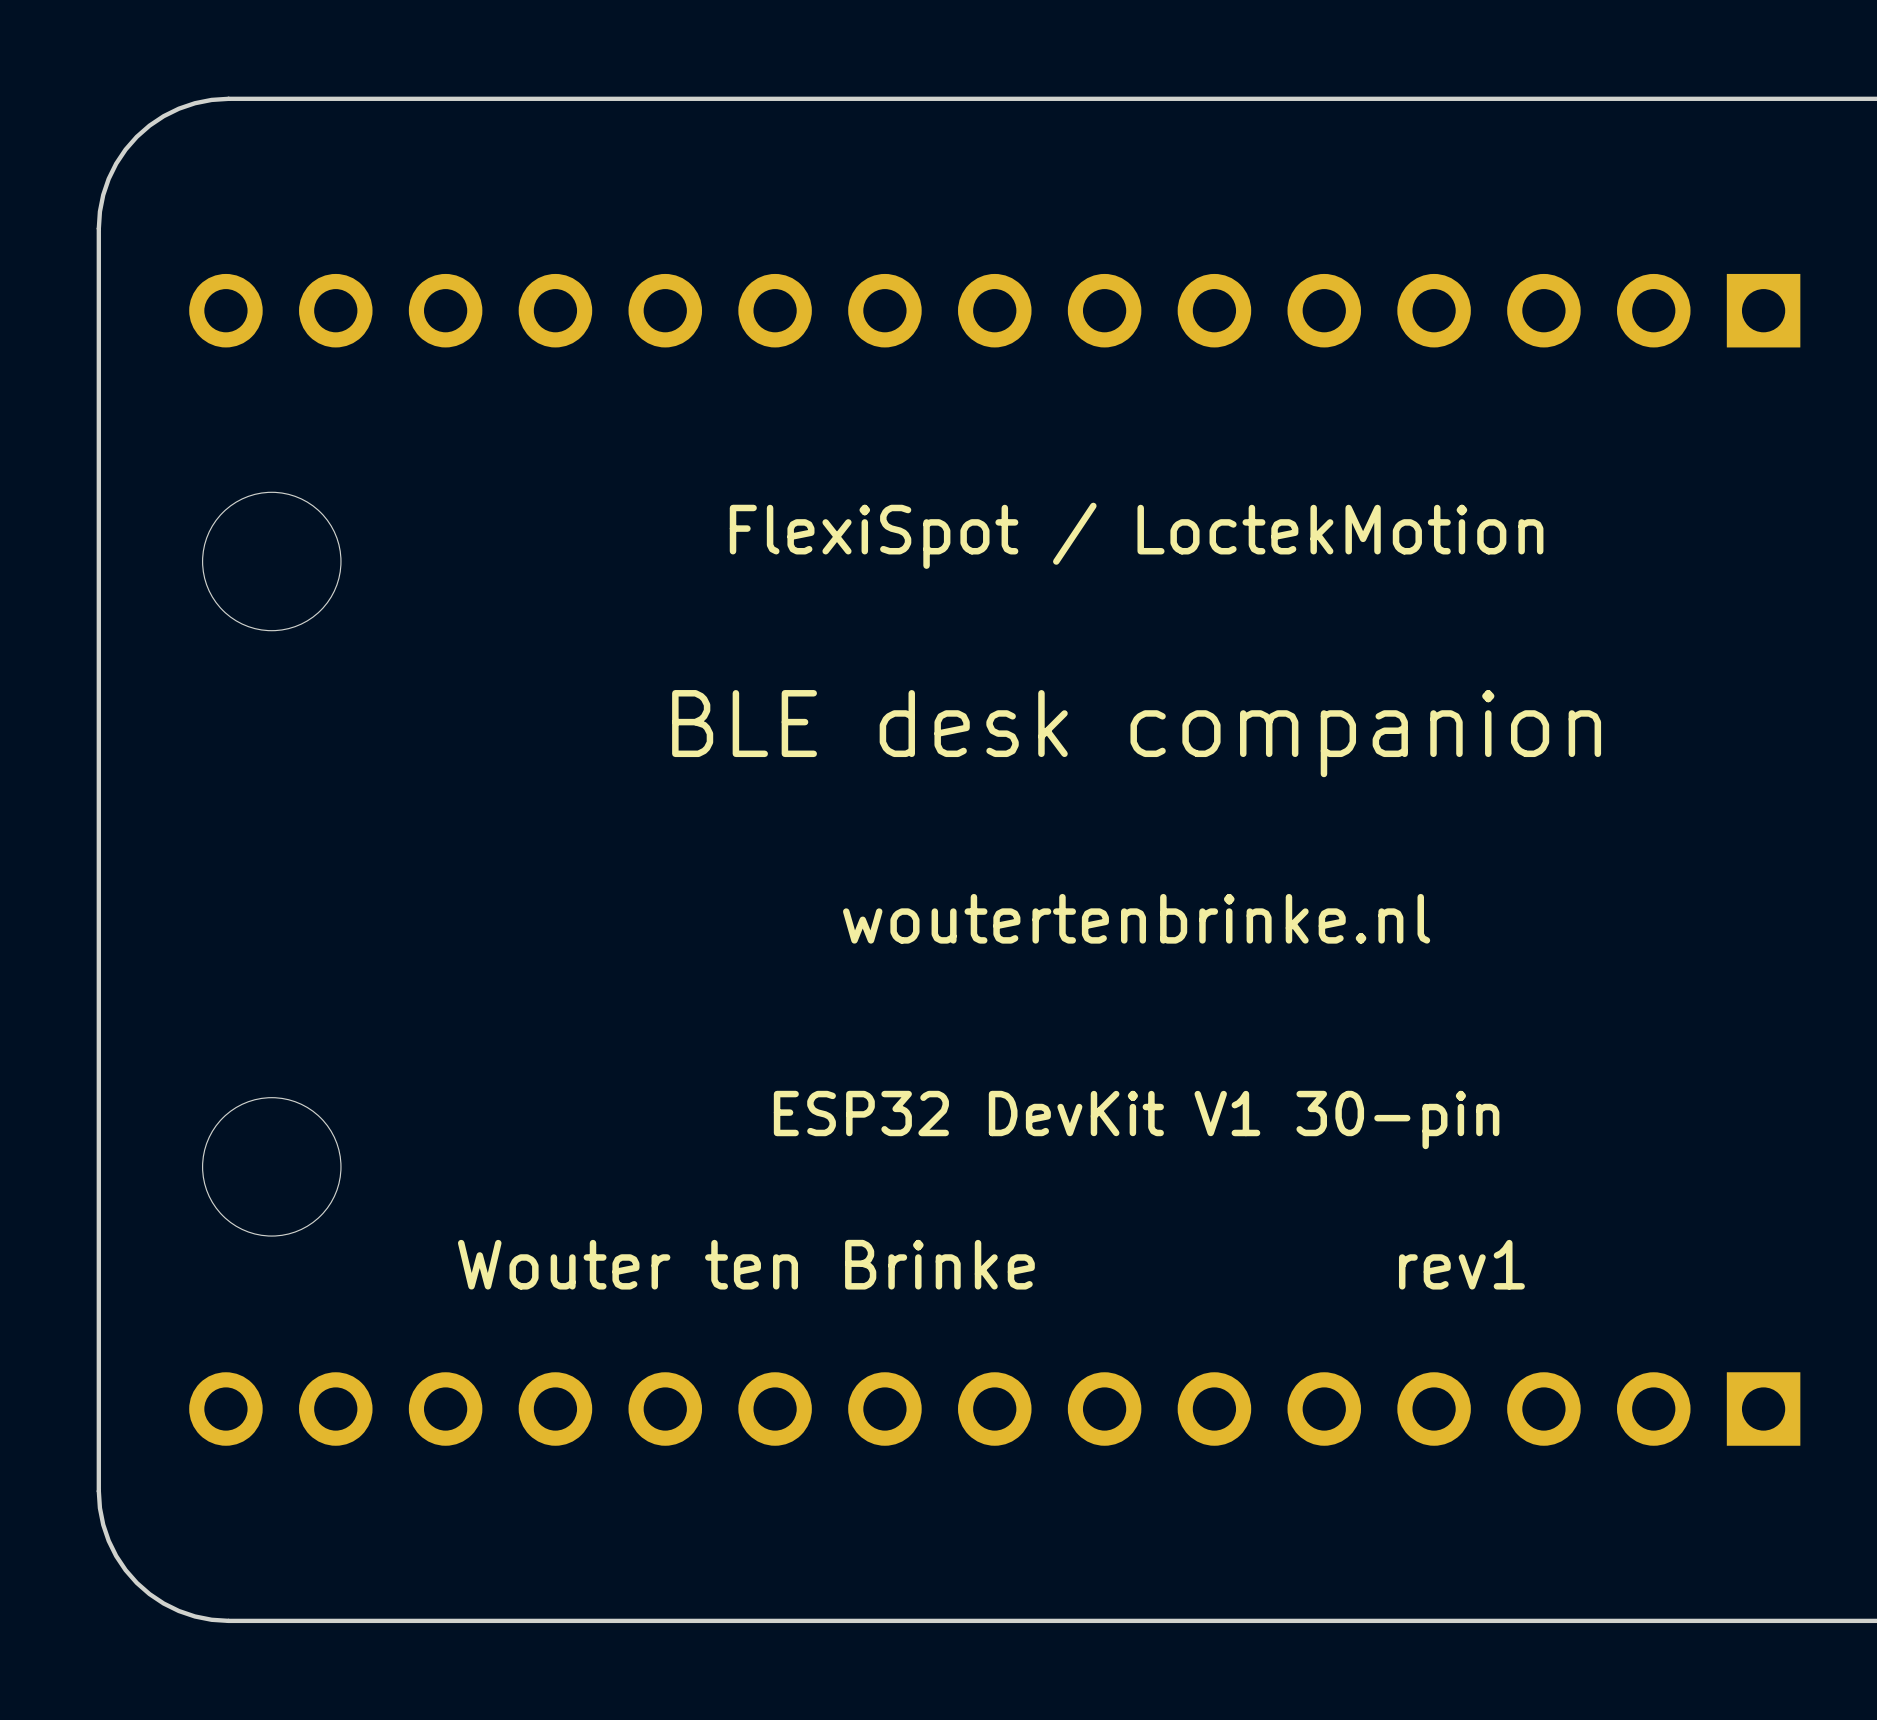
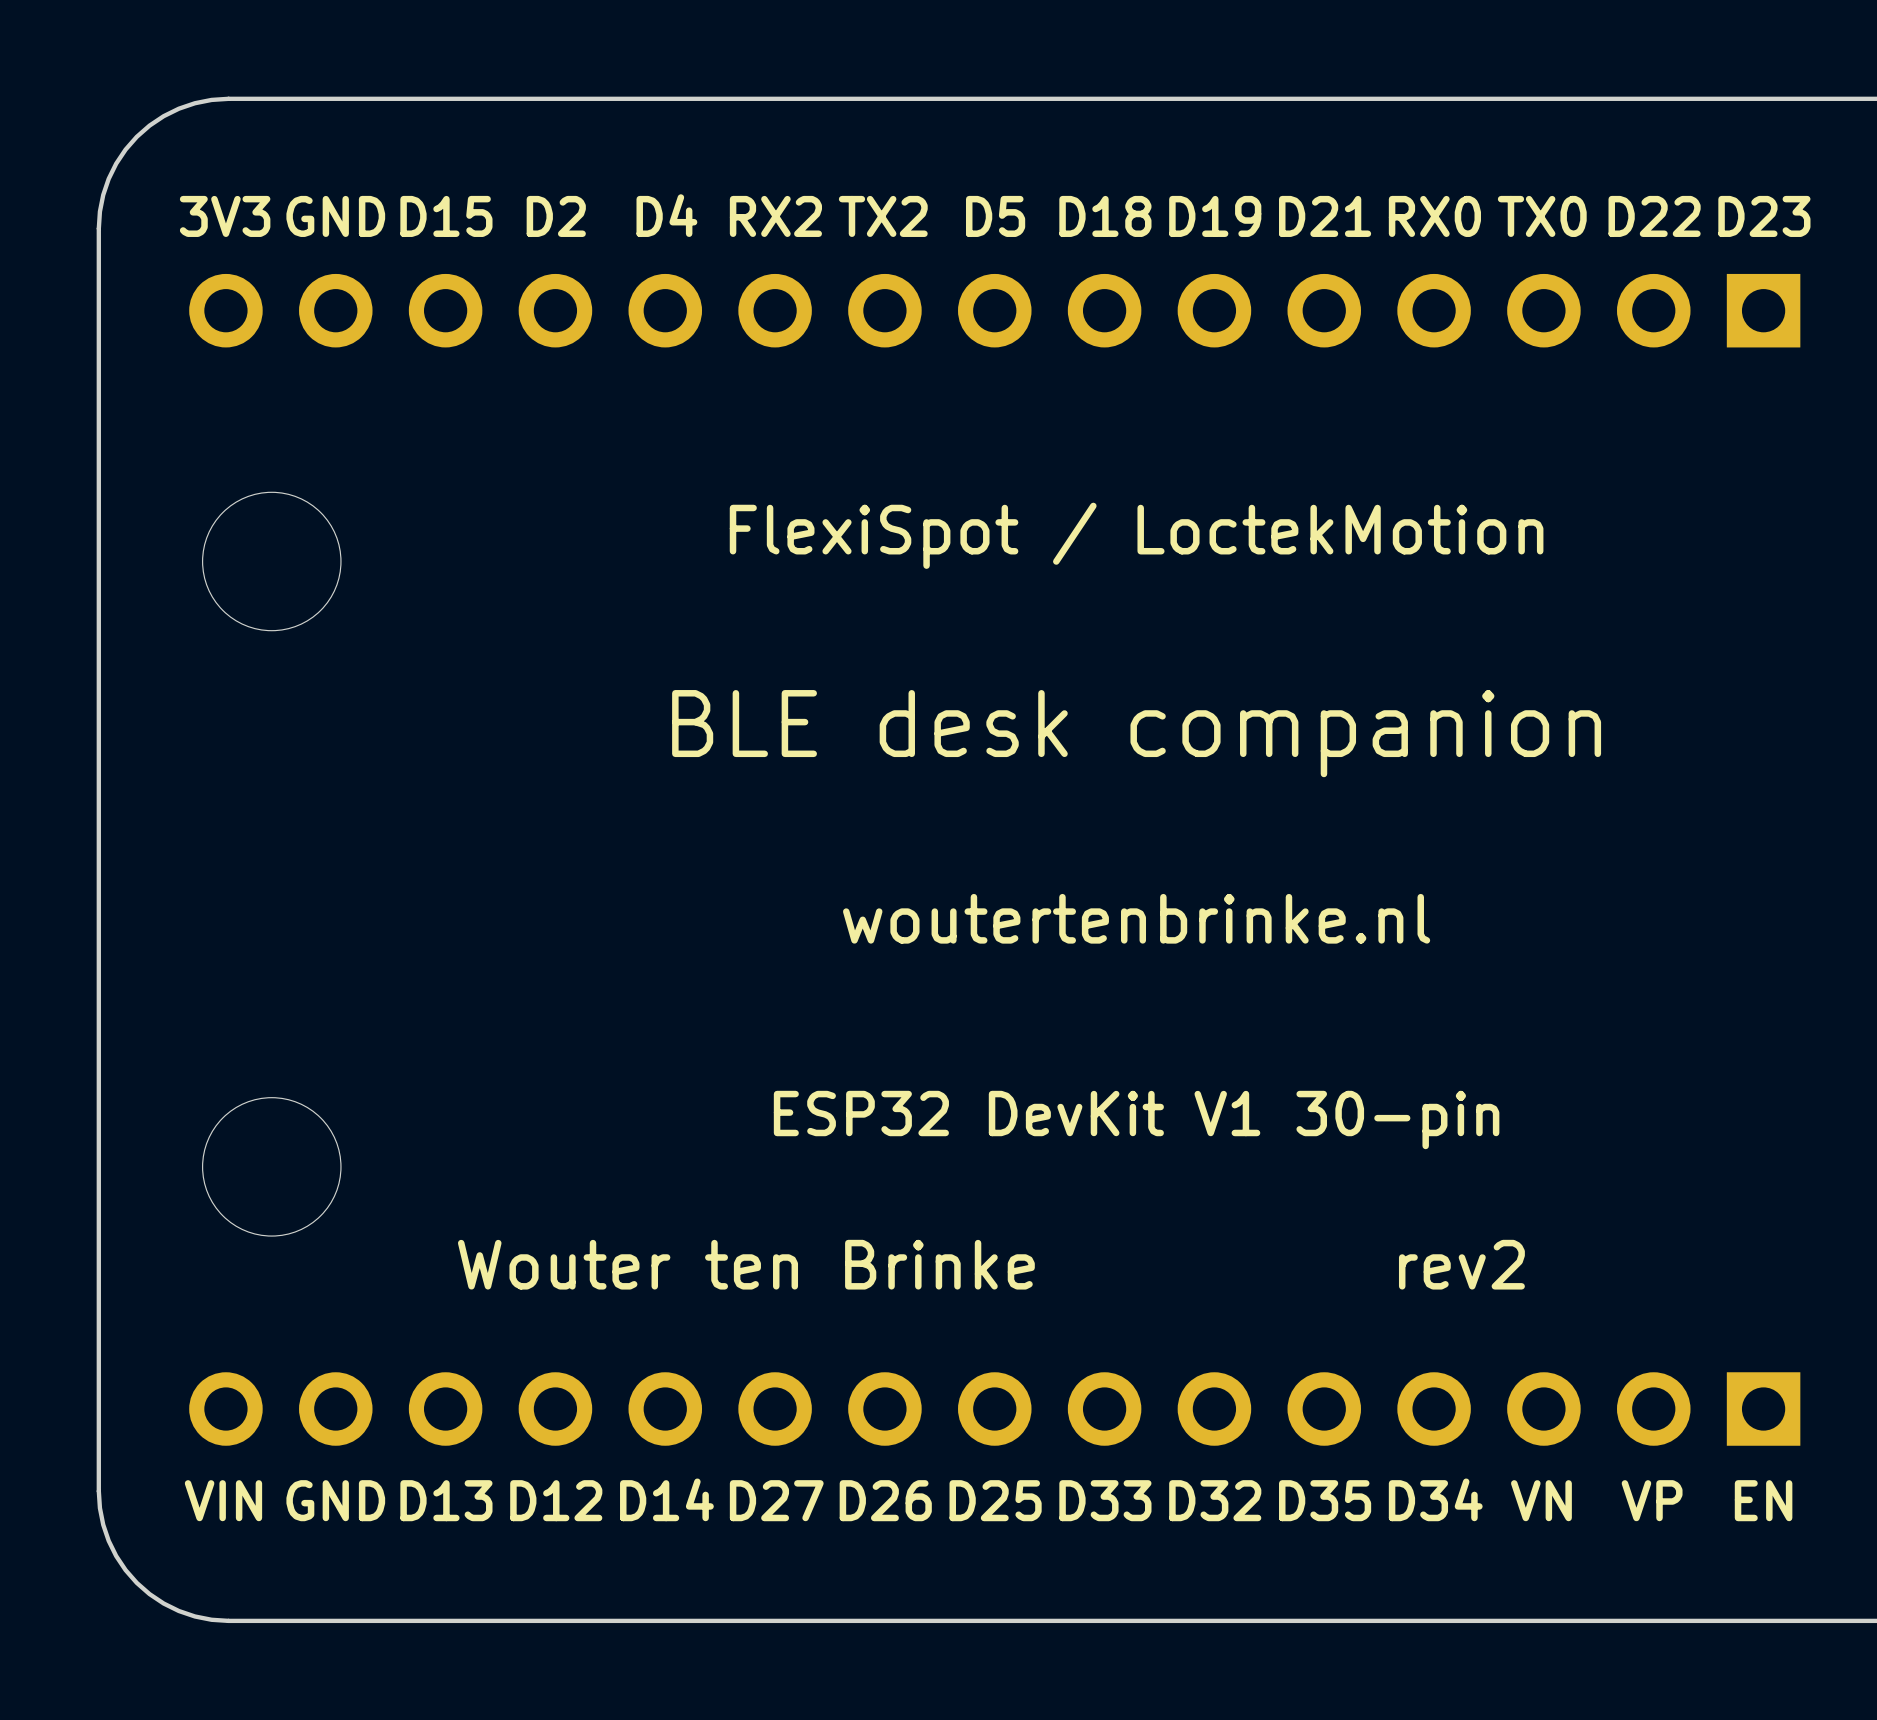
text: none -> D4 (666, 215)
text: none -> 3V3 (225, 216)
text: none -> GND (335, 216)
text: none -> D15 (446, 216)
text: none -> D2 (556, 216)
text: none -> RX2 (775, 216)
text: none -> TX2 (883, 216)
text: none -> D5 (995, 216)
text: none -> D18 (1105, 216)
text: none -> D19 (1215, 216)
text: none -> D21 (1325, 216)
text: none -> RX0 (1434, 216)
text: none -> TX0 (1542, 216)
text: none -> D22 (1654, 216)
text: none -> D23 (1764, 216)
text: rev1 (1461, 1264) -> rev2 (1461, 1264)
text: none -> D14 (666, 1499)
text: none -> D34 (1435, 1499)
text: none -> VIN (223, 1500)
text: none -> GND (335, 1500)
text: none -> D13 (446, 1500)
text: none -> D12 (556, 1500)
text: none -> D27 (776, 1500)
text: none -> D26 (885, 1500)
text: none -> D25 (995, 1500)
text: none -> D33 (1105, 1500)
text: none -> D32 (1215, 1500)
text: none -> D35 (1325, 1500)
text: none -> VN (1541, 1500)
text: none -> VP (1652, 1500)
text: none -> EN (1763, 1500)

